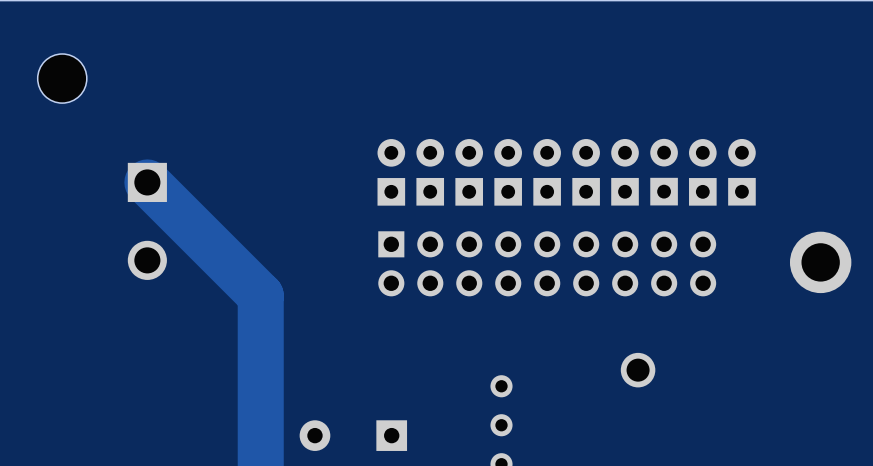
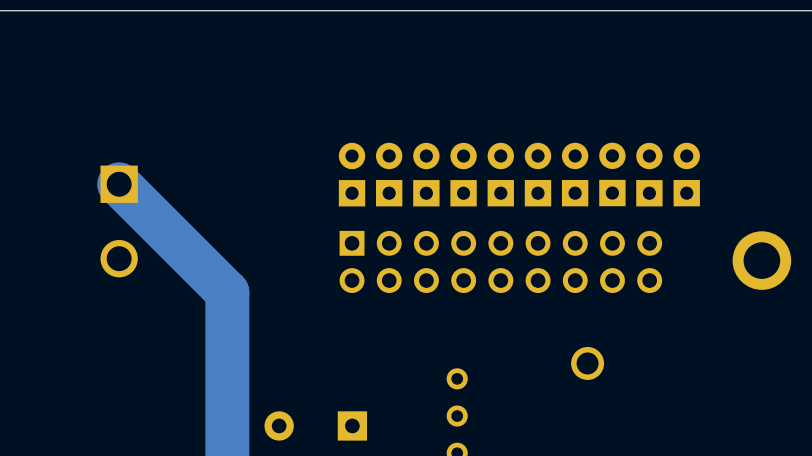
part: (62, 78) -> none

